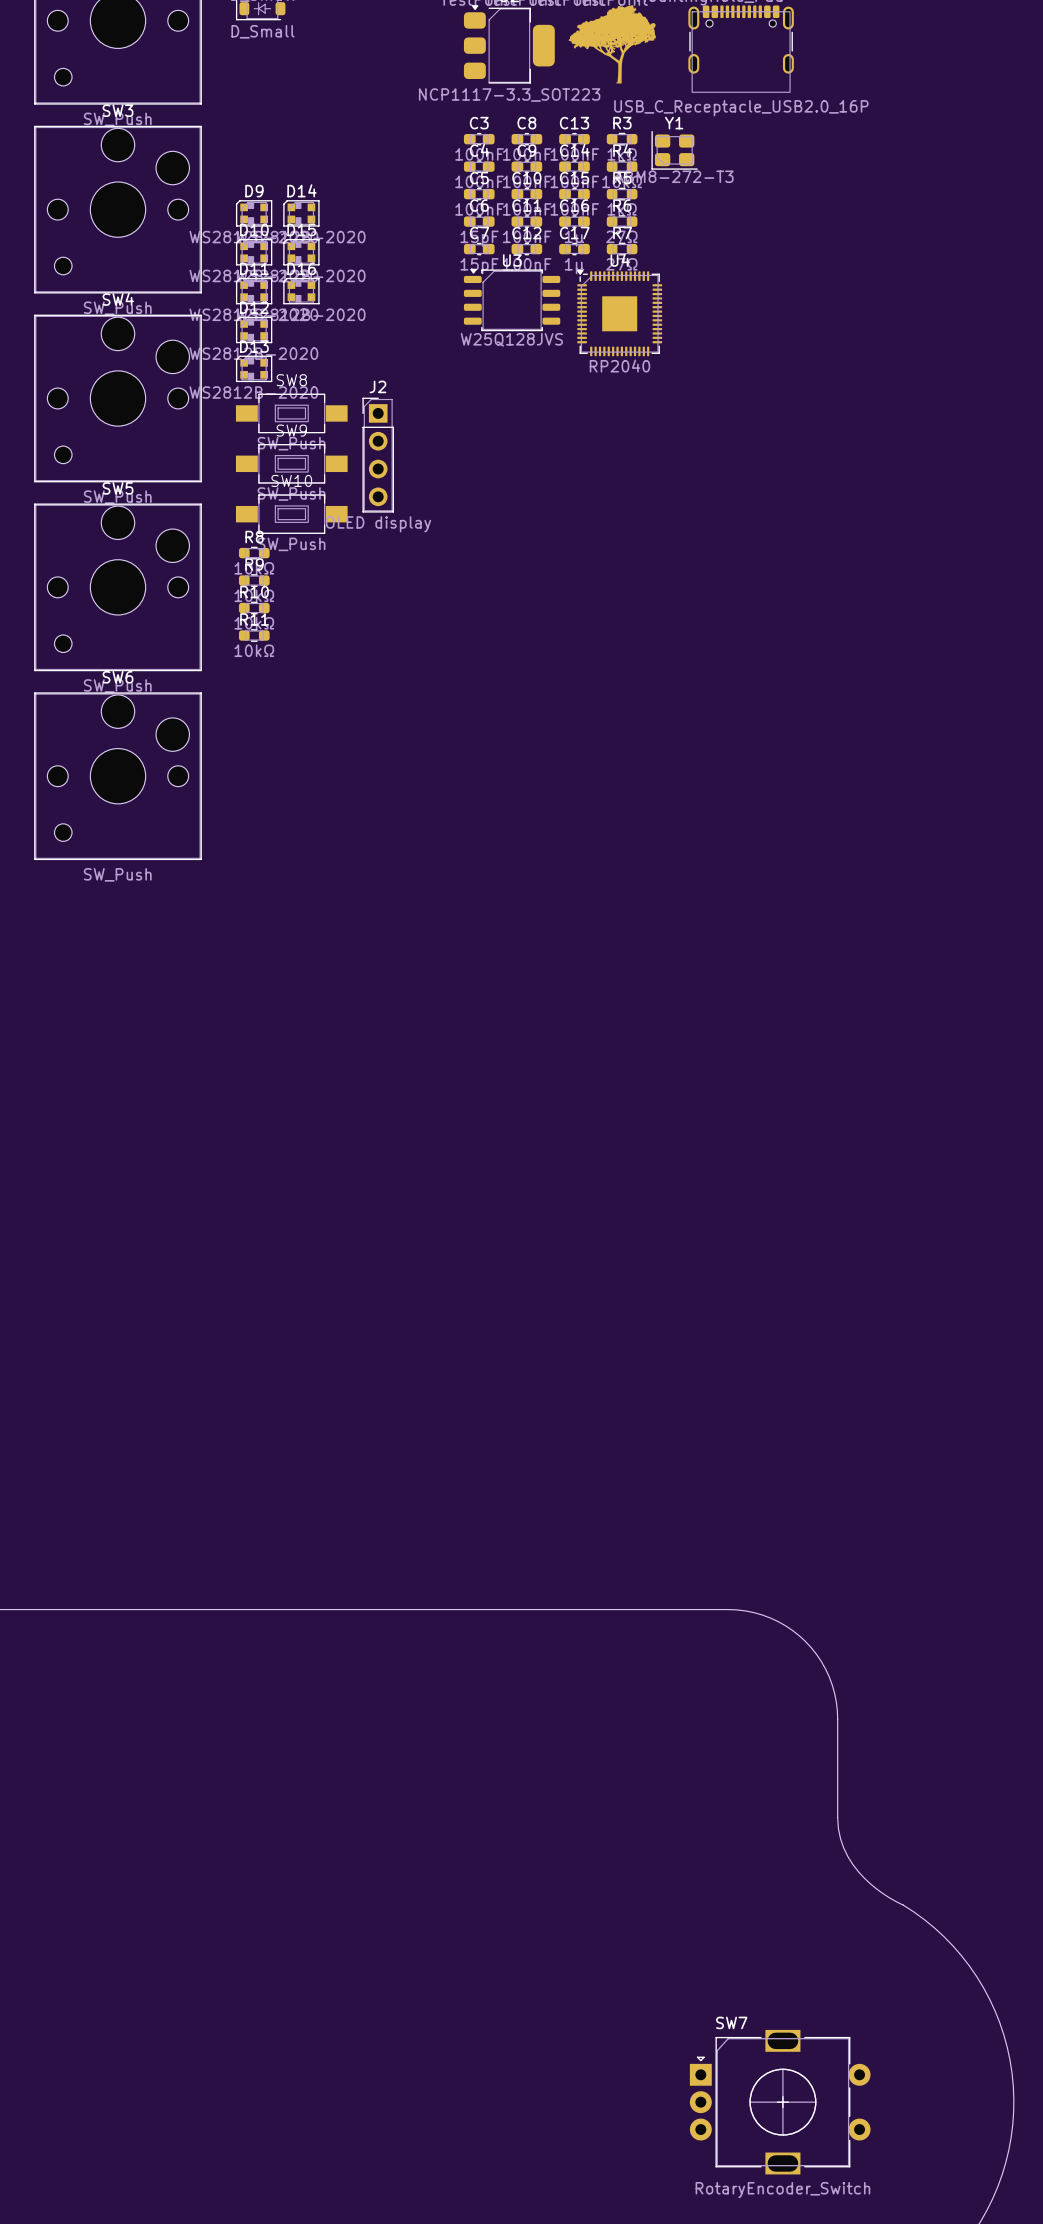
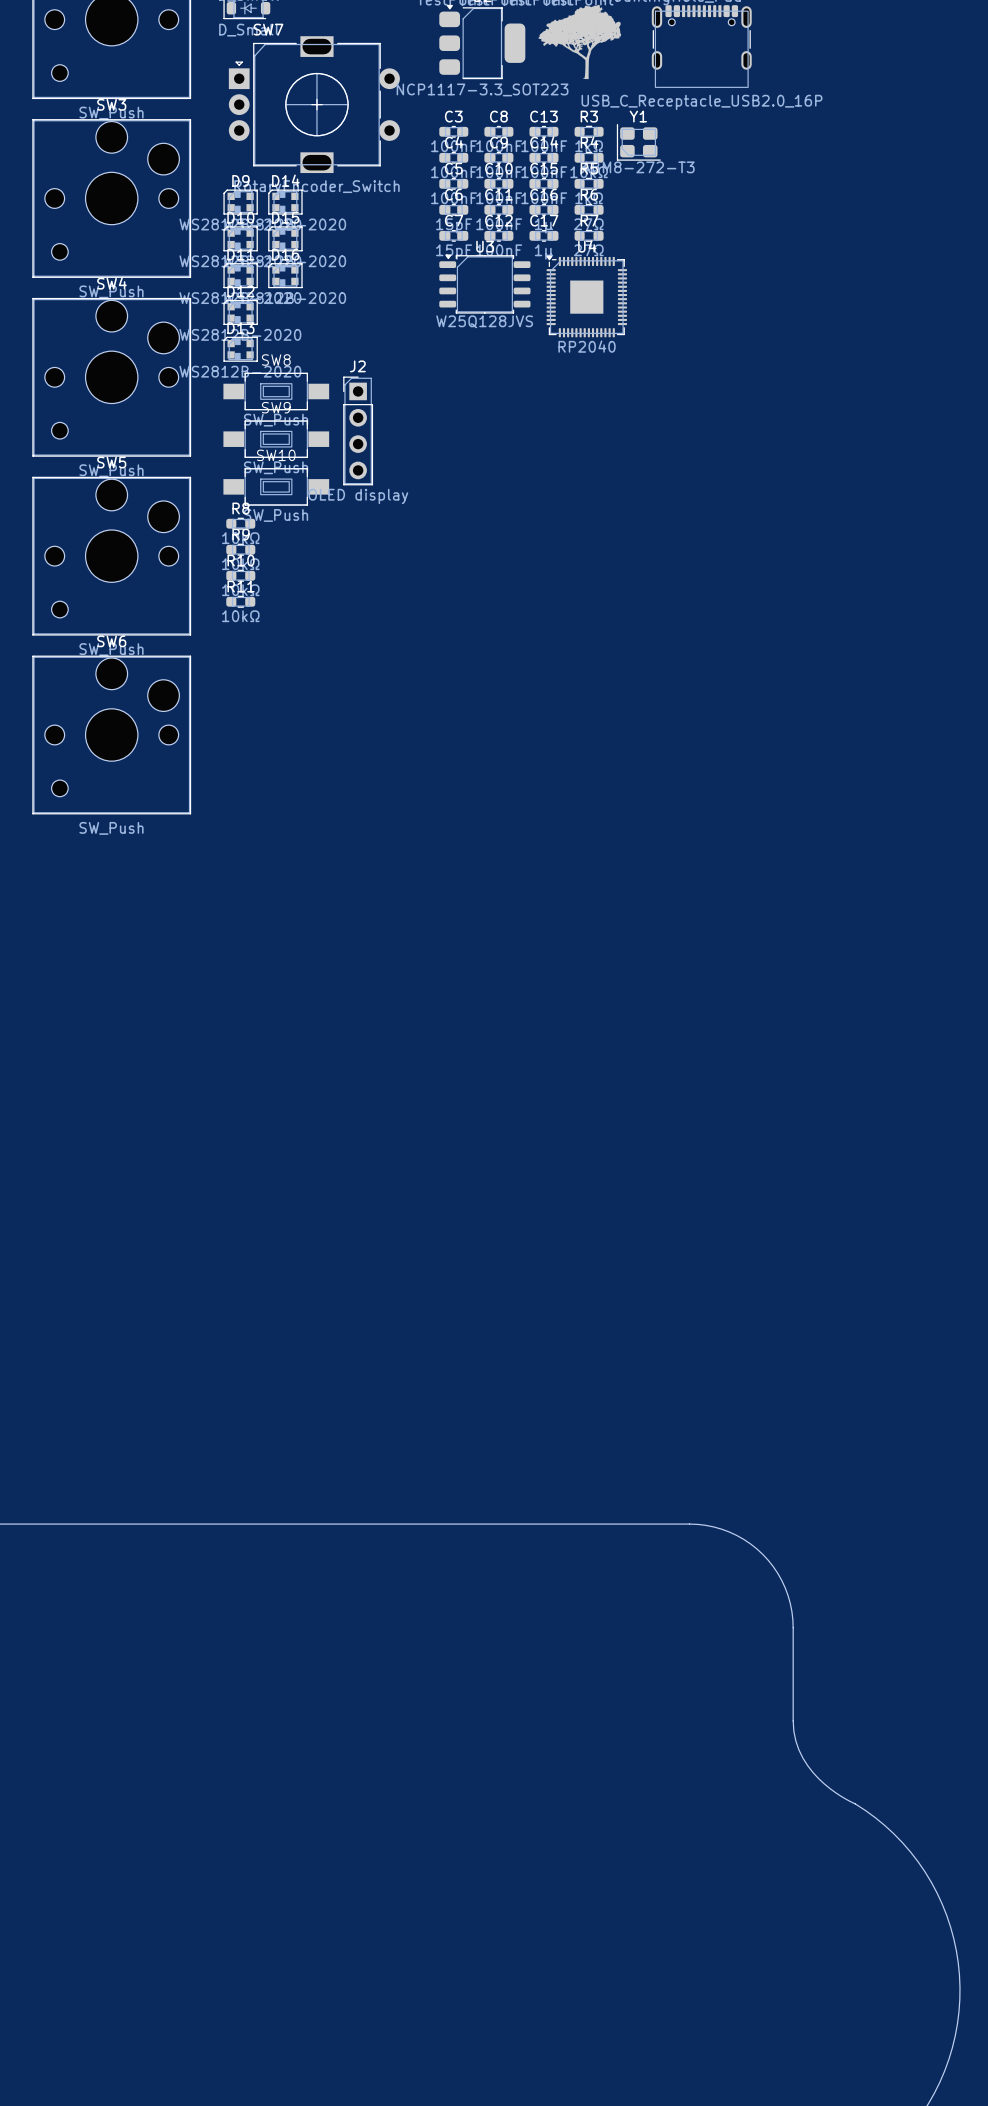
SW7 position: (780, 2102) -> (314, 104)

